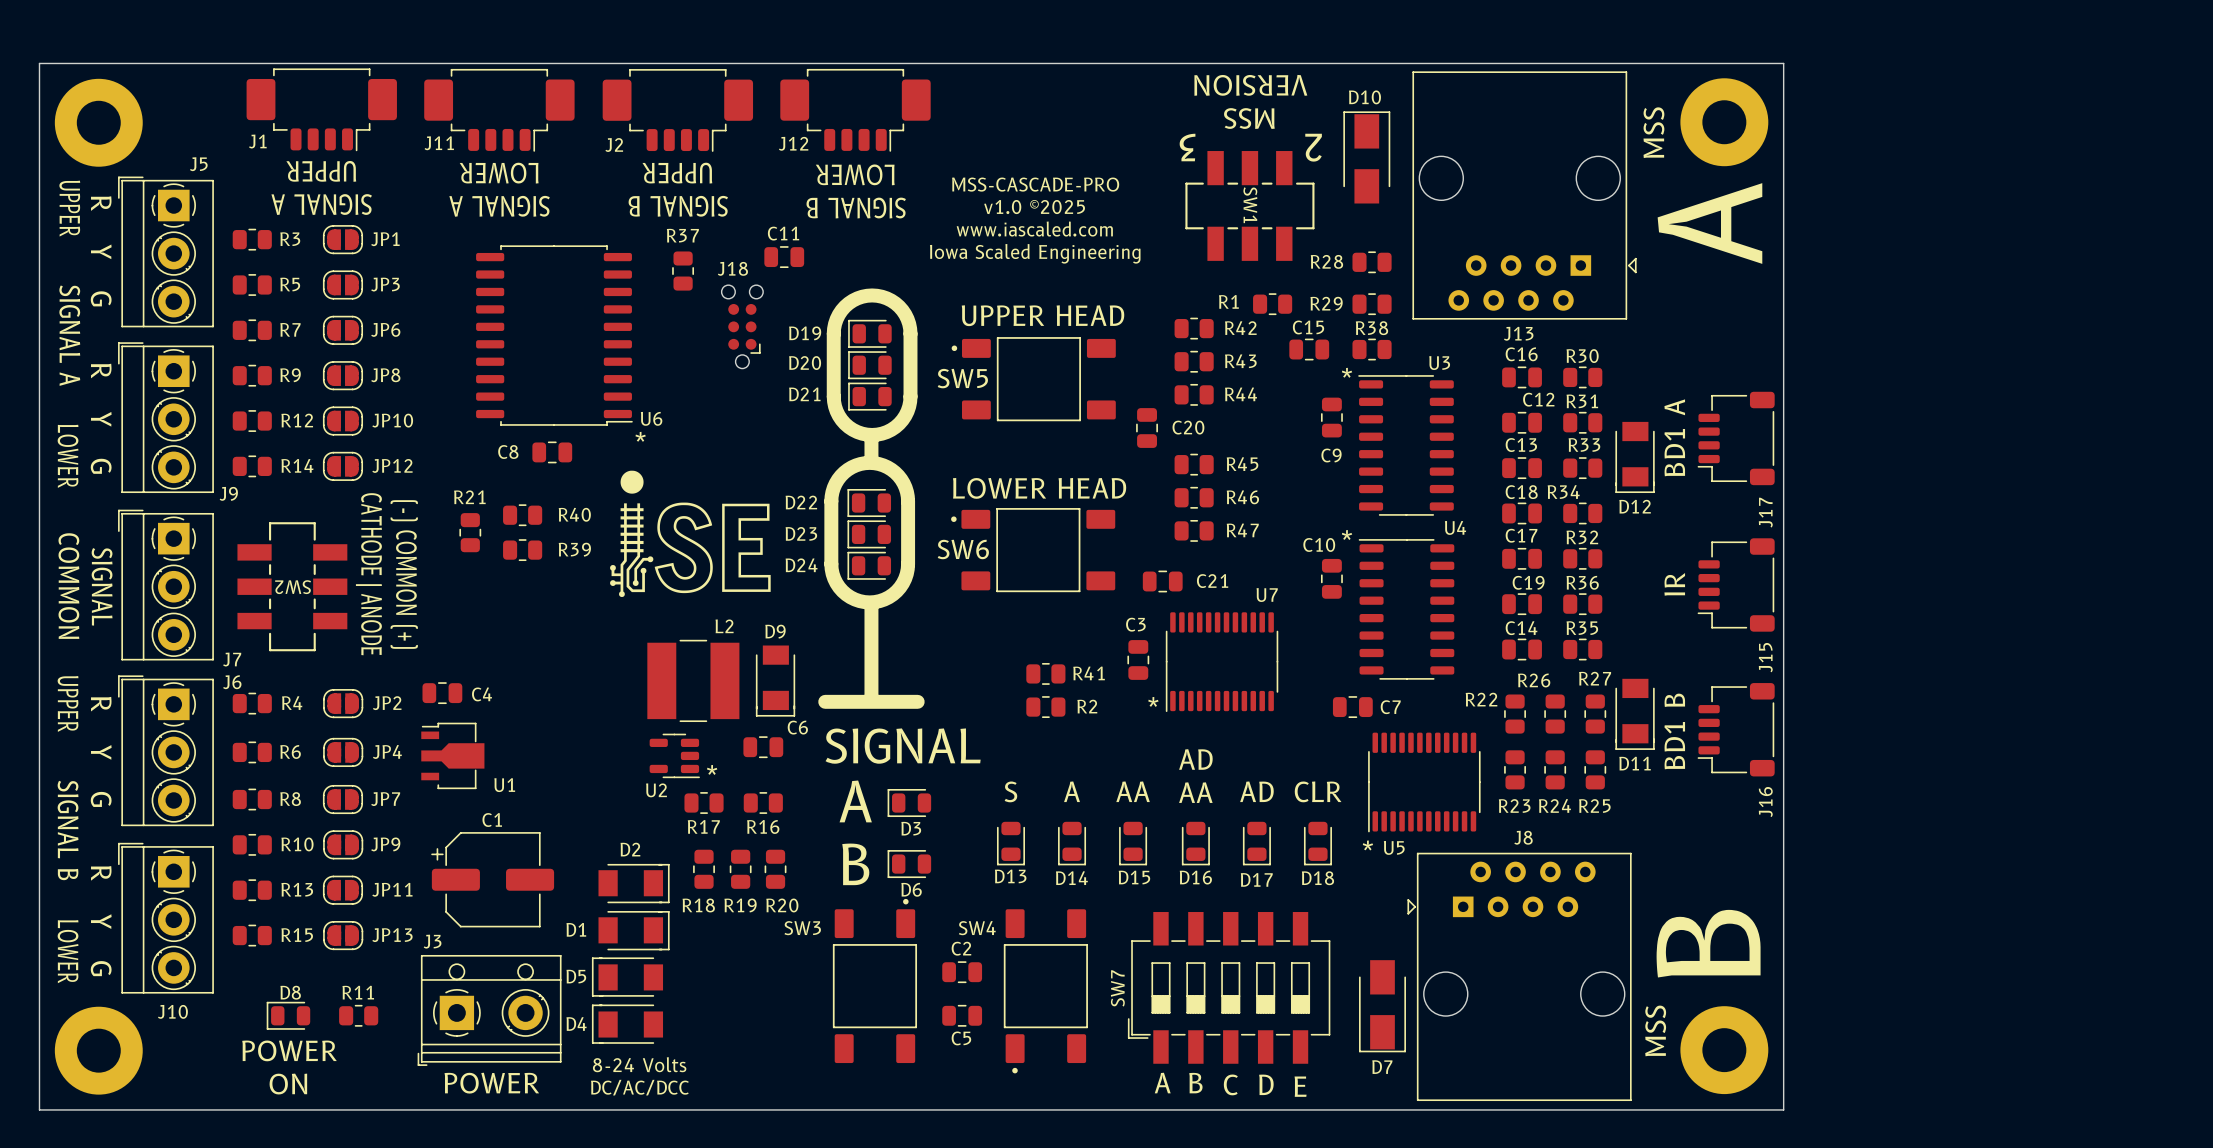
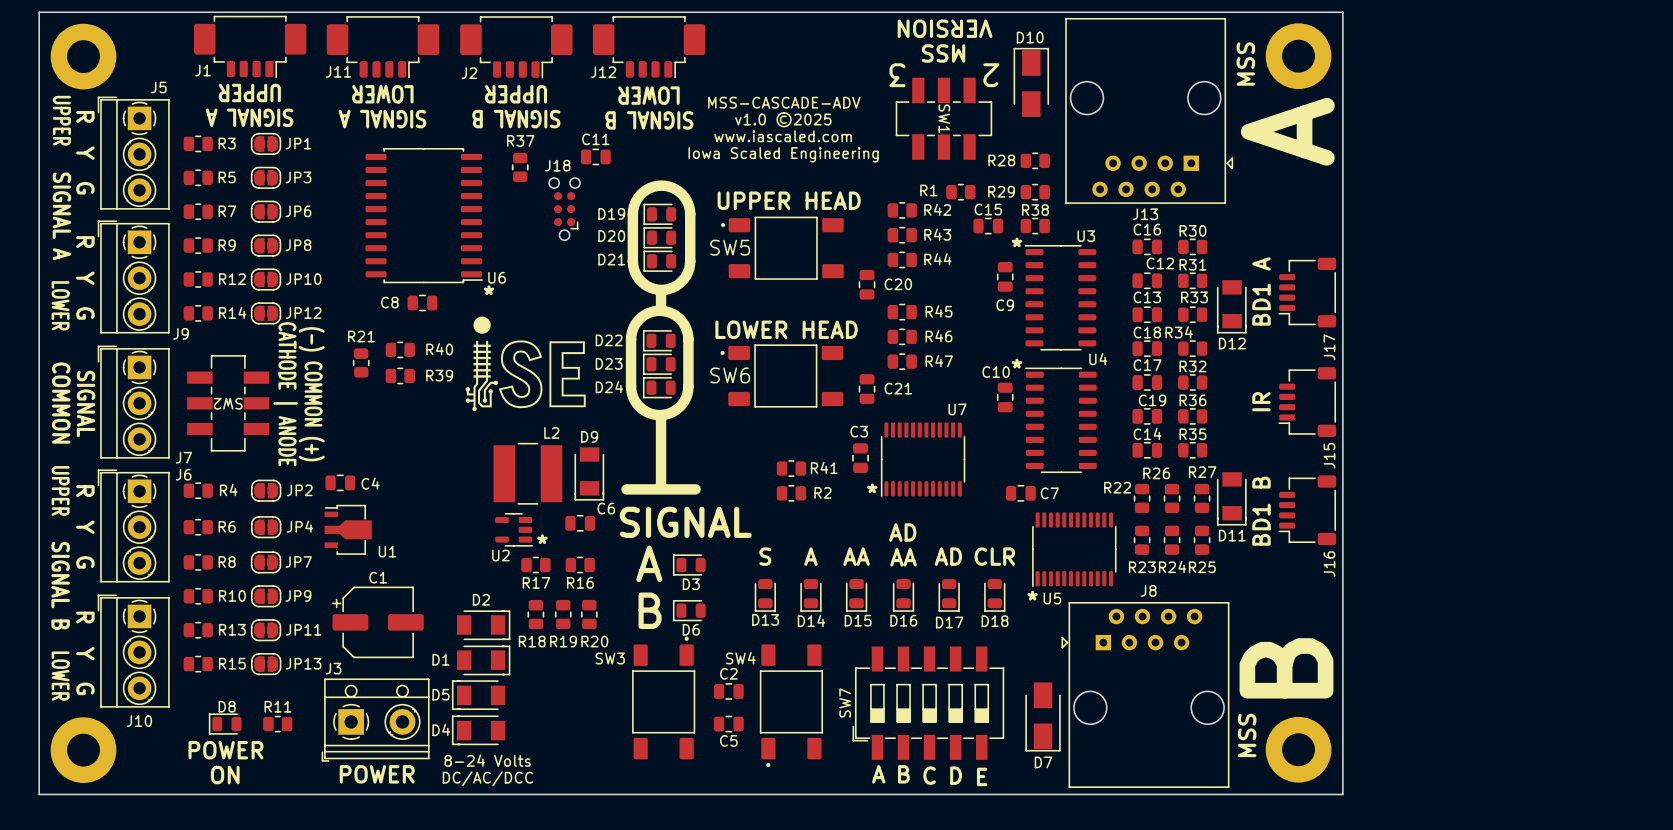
text: MSS-CASCADE-PRO (1035, 184) -> MSS-CASCADE-ADV (784, 102)
C21 rotation: 0° (1162, 581) -> 90° clockwise (867, 389)

